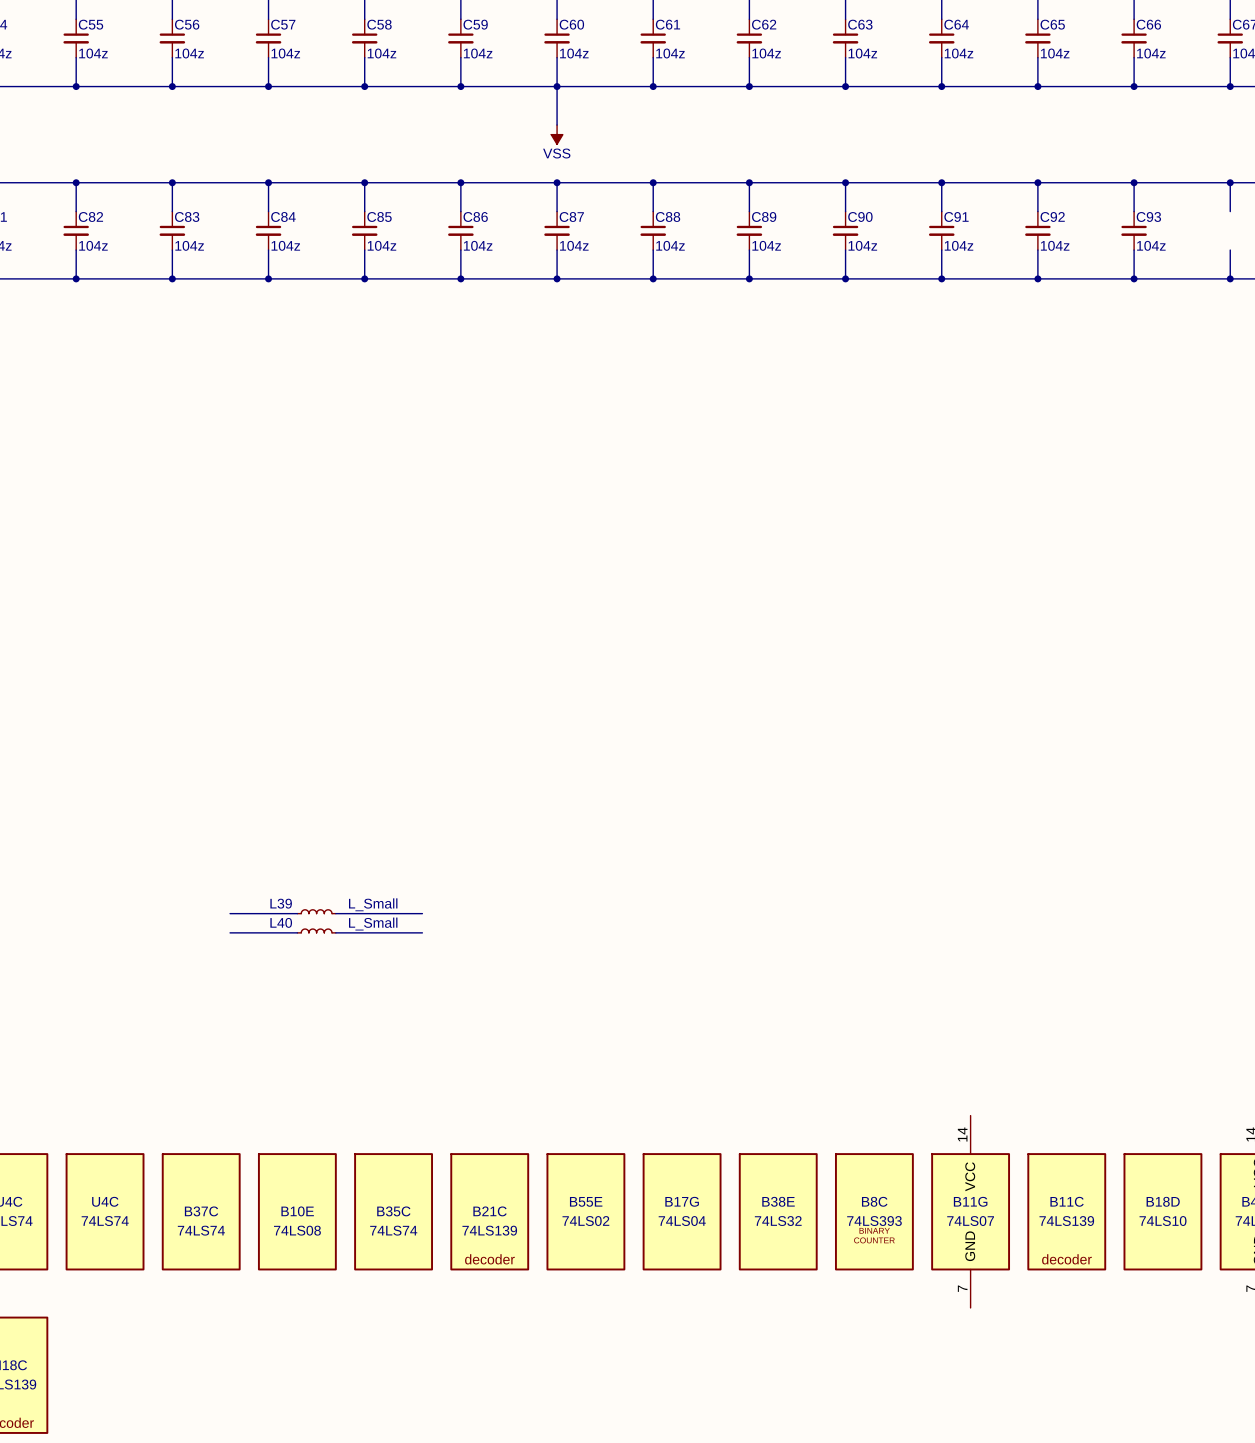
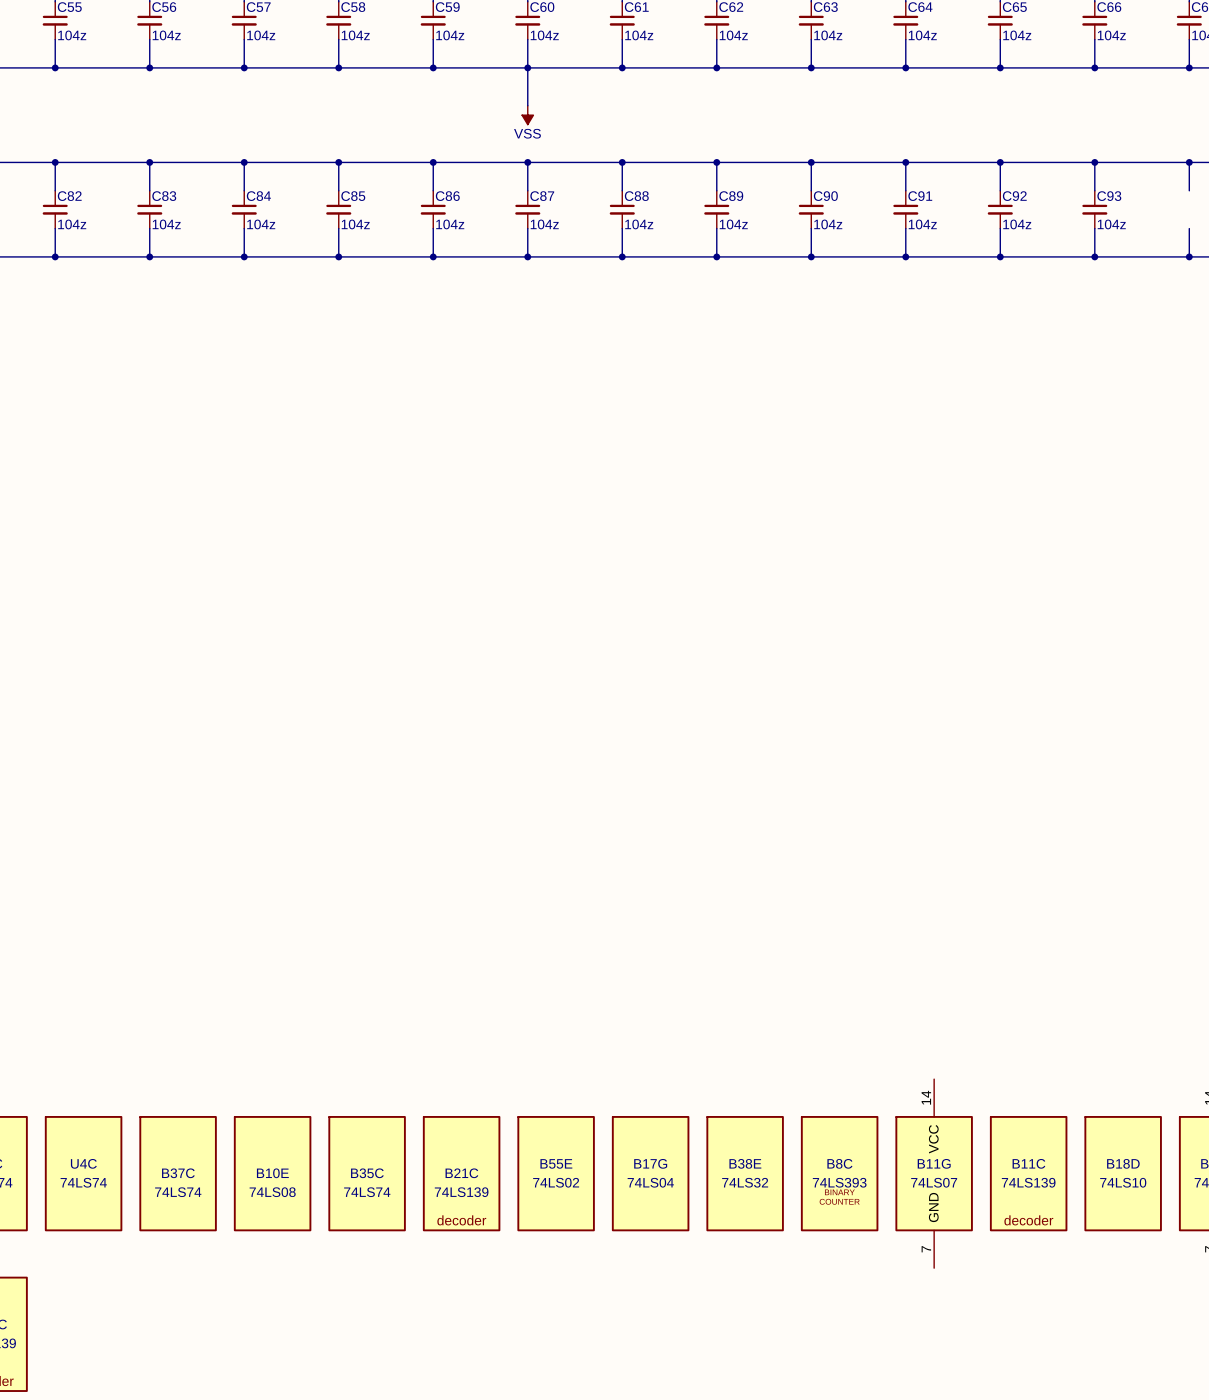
L39: L_Small (316, 911) -> none
wire: (230, 913) (297, 913) -> none
wire: (335, 913) (422, 913) -> none
L40: L_Small (316, 930) -> none
wire: (230, 932) (297, 932) -> none
wire: (335, 932) (422, 932) -> none

